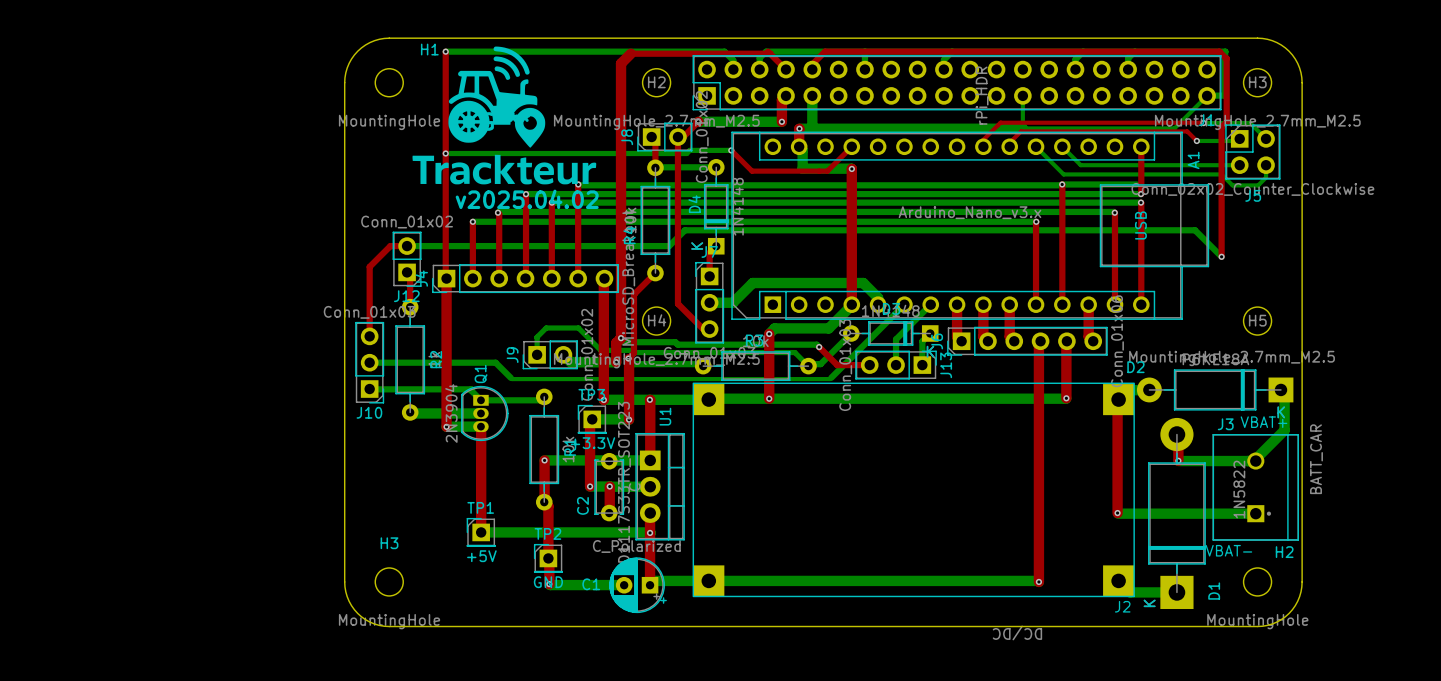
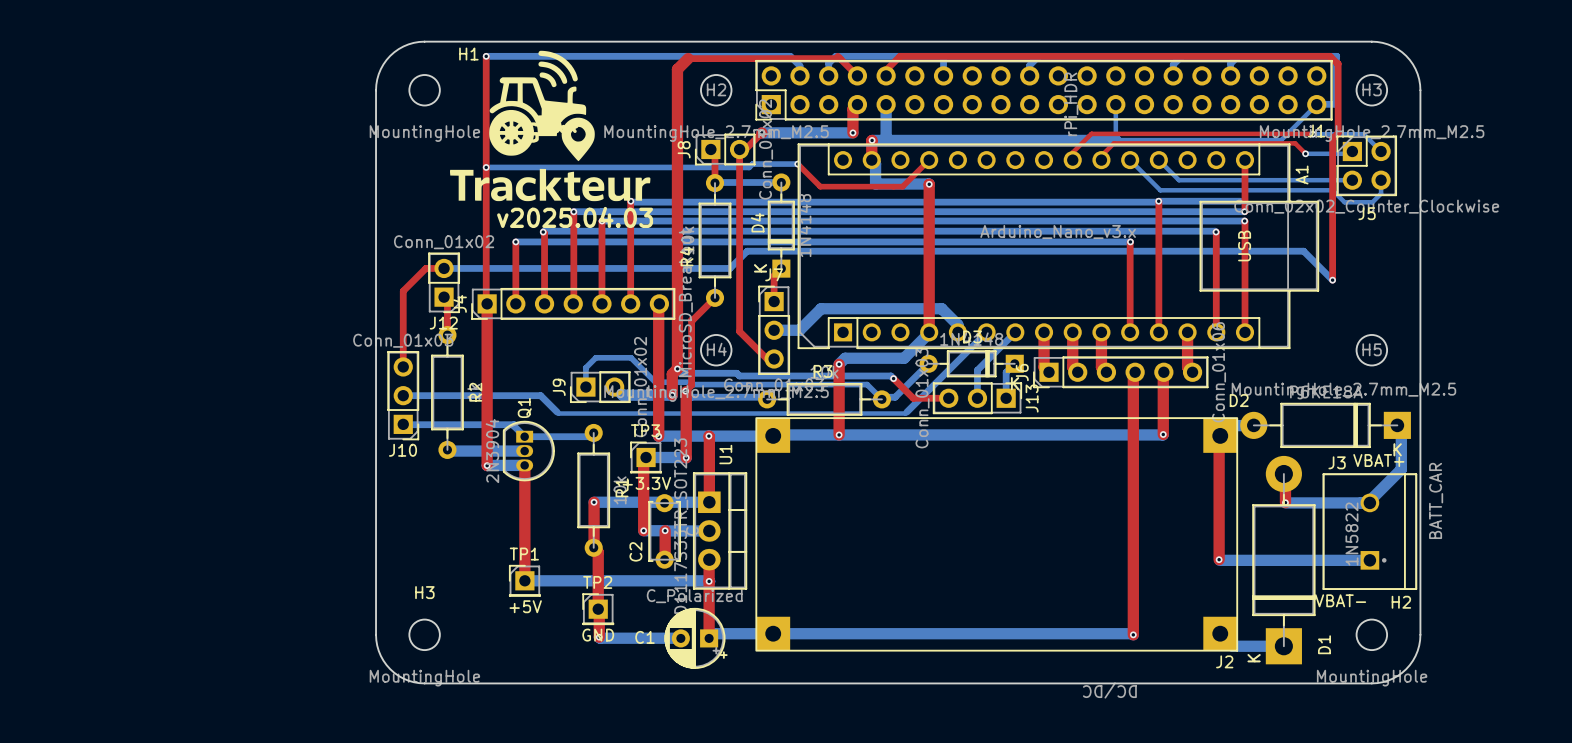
text: v2025.04.02 (527, 199) -> v2025.04.03 (575, 217)

